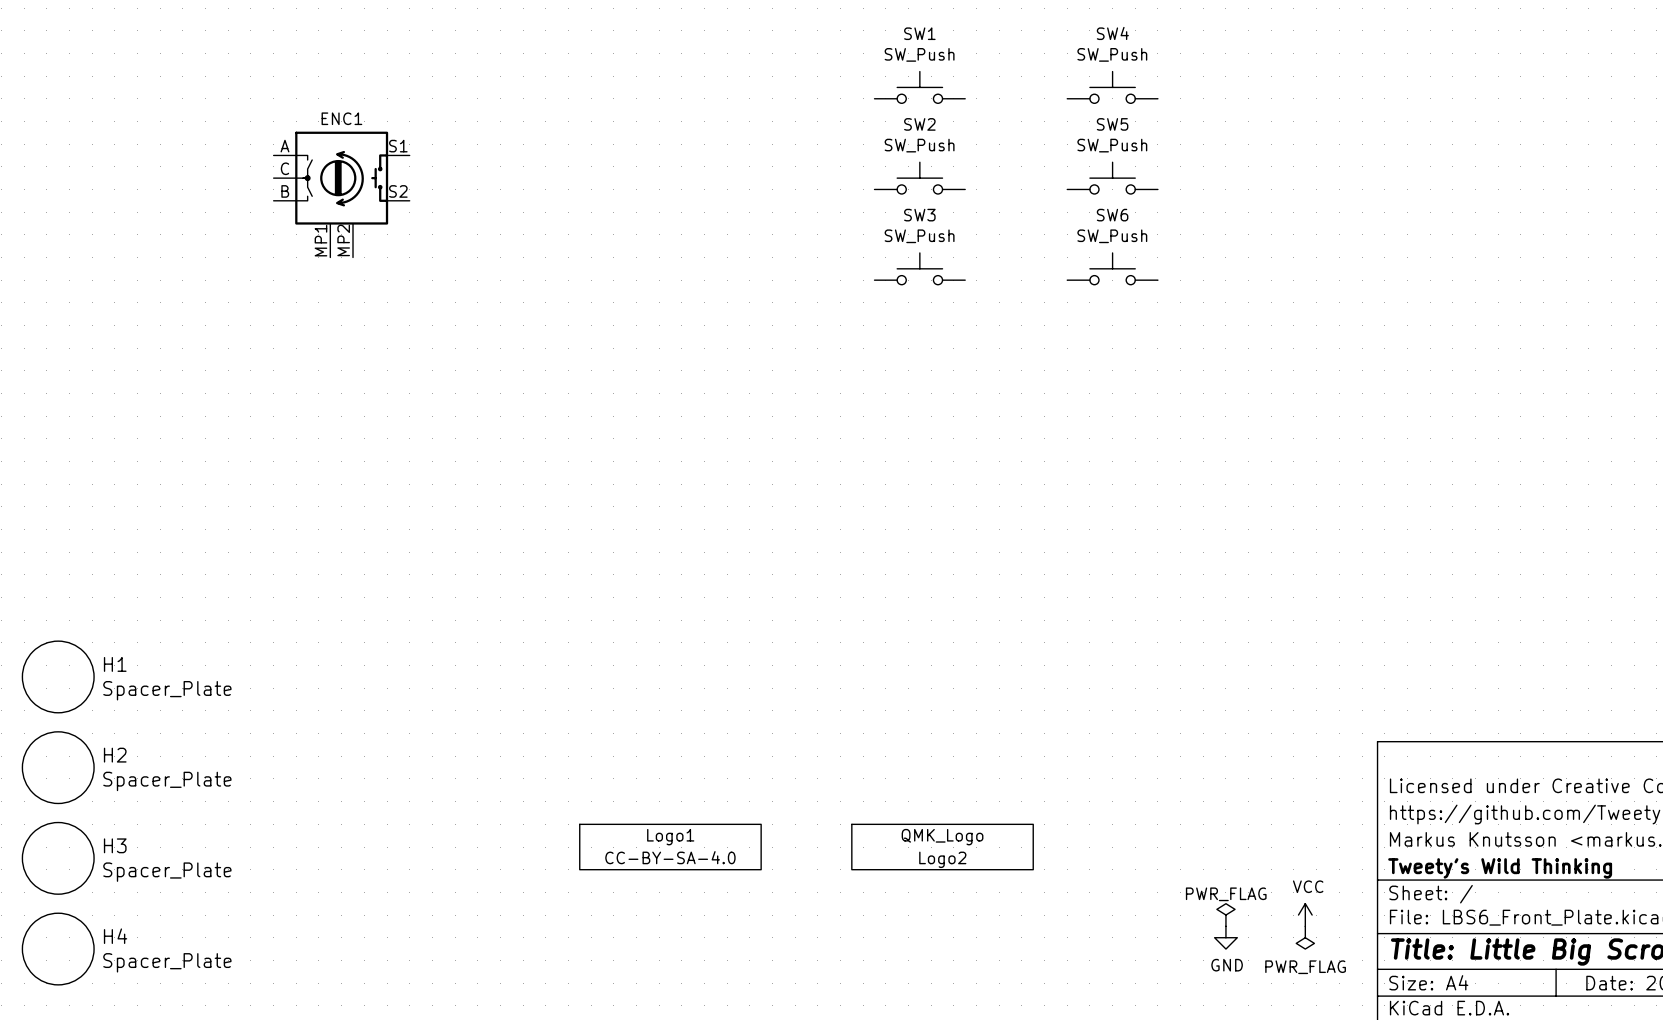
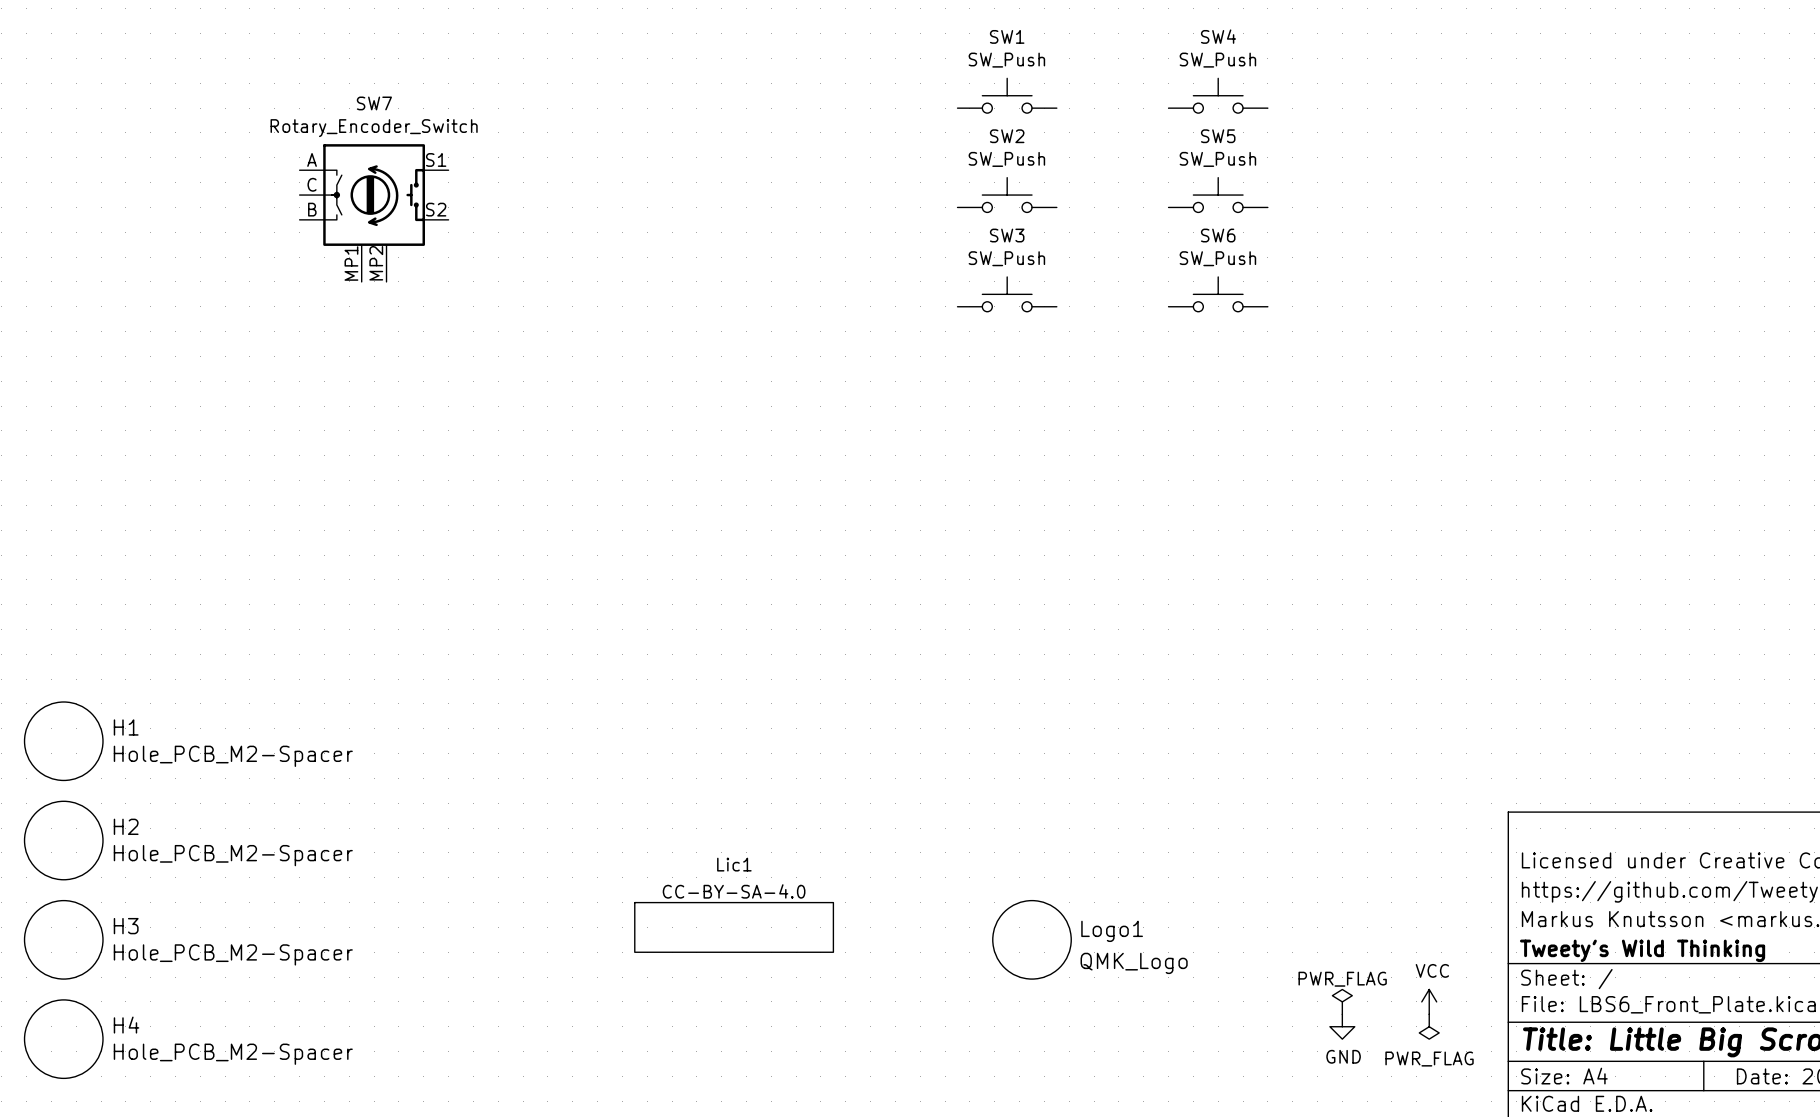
ENC1 value: none -> Rotary_Encoder_Switch (374, 128)
ENC1 name: ENC1 (341, 118) -> SW7 (374, 103)
H1 value: Spacer_Plate (167, 690) -> Hole_PCB_M2-Spacer (233, 756)
H2 value: Spacer_Plate (167, 781) -> Hole_PCB_M2-Spacer (233, 855)
Logo1 name: Logo1 (670, 837) -> Lic1 (734, 864)
Logo2: QMK_Logo (942, 847) -> none
Logo1 value position: CC-BY-SA-4.0 (670, 857) -> CC-BY-SA-4.0 (734, 891)
Logo1: none -> QMK_Logo (1032, 939)
H3 value: Spacer_Plate (167, 872) -> Hole_PCB_M2-Spacer (233, 954)
H4 value: Spacer_Plate (167, 962) -> Hole_PCB_M2-Spacer (233, 1054)

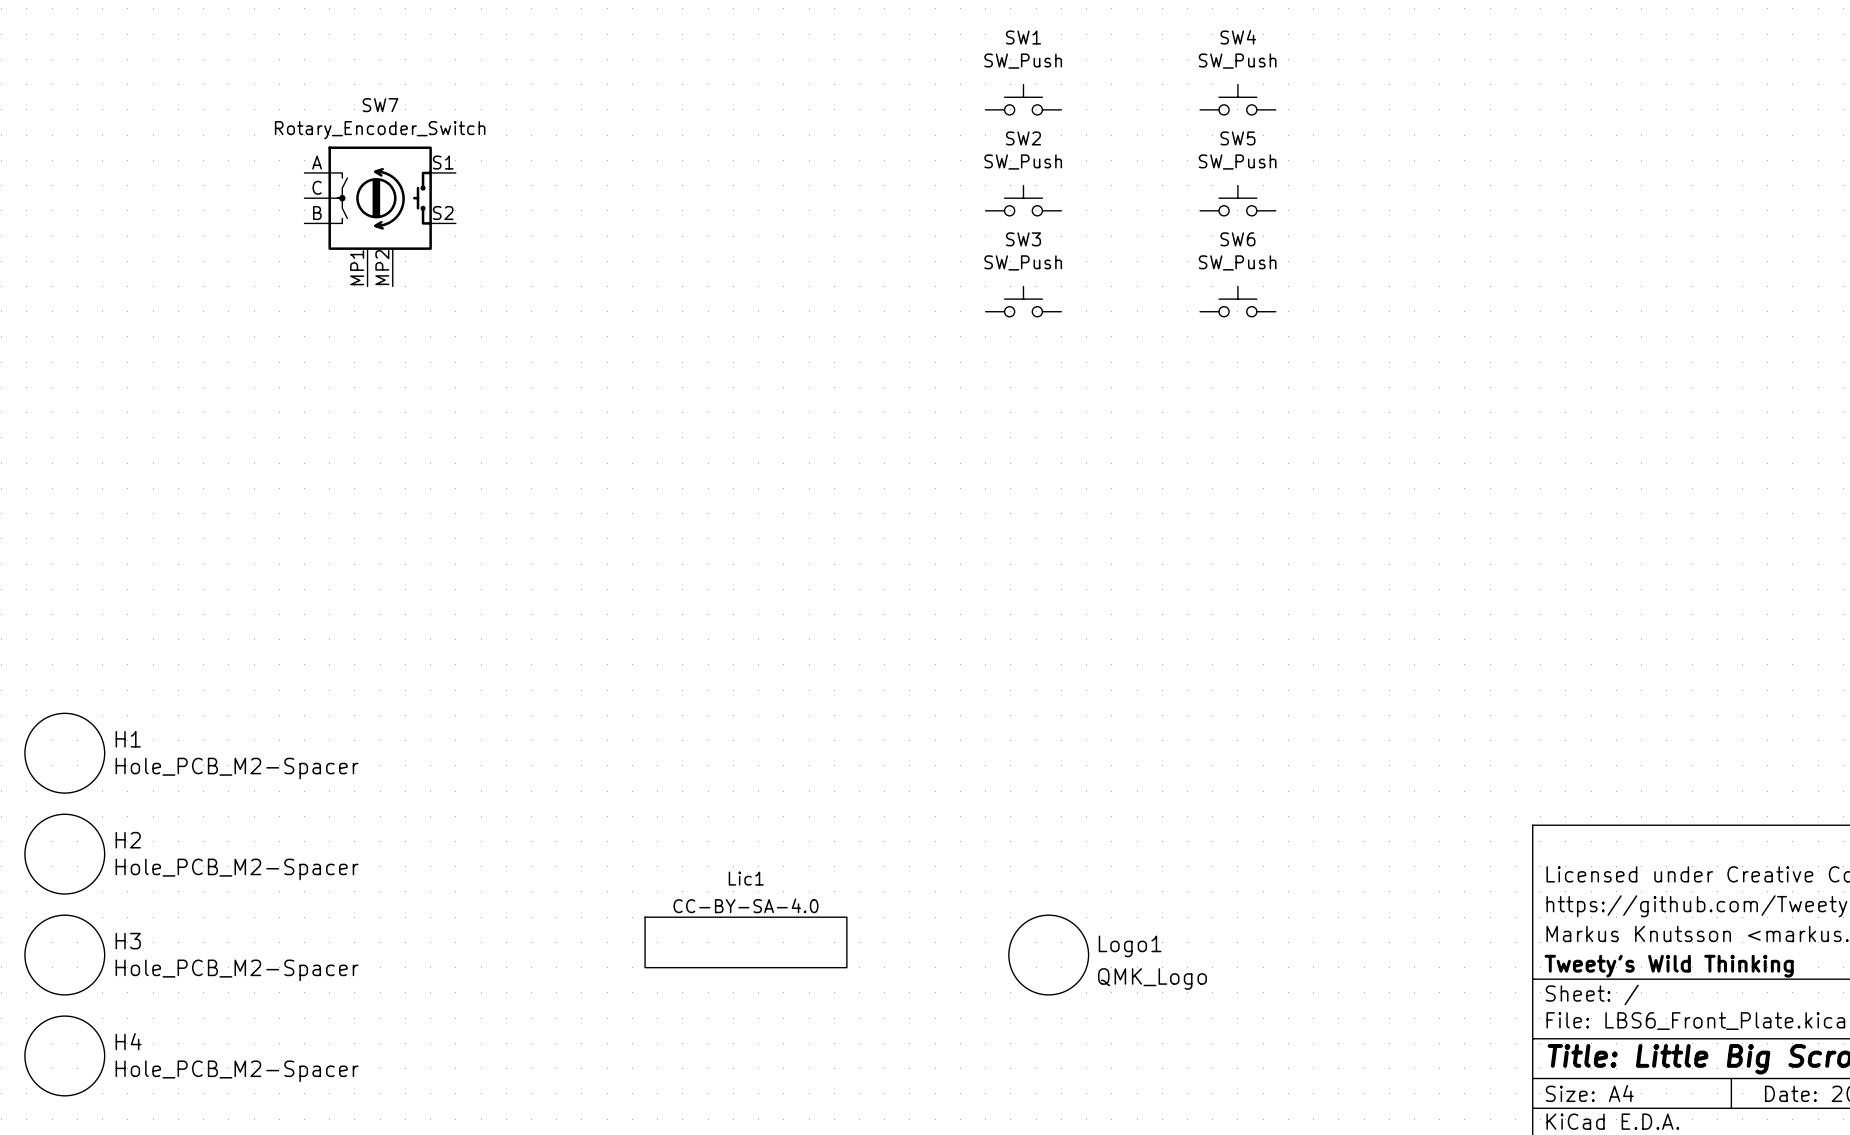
SW1 symbol: [957, 78, 1057, 114] -> [985, 84, 1062, 115]
SW4 symbol: [1168, 78, 1268, 114] -> [1200, 84, 1276, 115]
SW2 symbol: [957, 177, 1057, 213] -> [985, 185, 1062, 216]
SW5 symbol: [1168, 177, 1268, 213] -> [1200, 185, 1276, 216]
SW3 symbol: [957, 276, 1057, 312] -> [985, 286, 1062, 317]
SW6 symbol: [1168, 276, 1268, 312] -> [1200, 286, 1276, 317]
power symbol: PWR_FLAG (1342, 1001) -> none
power symbol: VCC (1429, 1001) -> none
power symbol: GND (1342, 1026) -> none
power symbol: PWR_FLAG (1429, 1026) -> none

